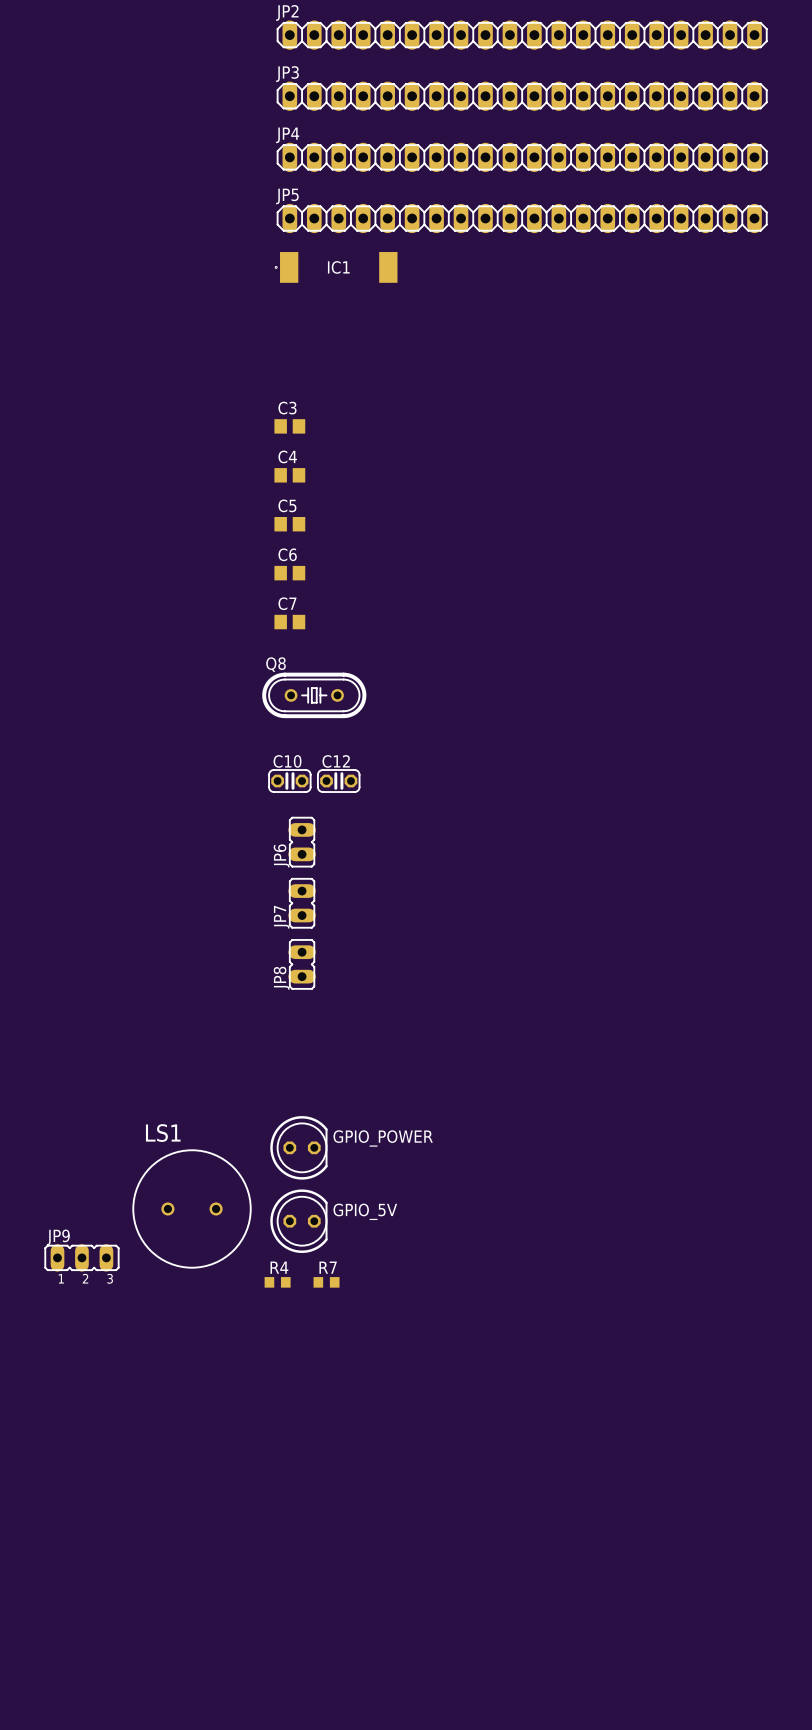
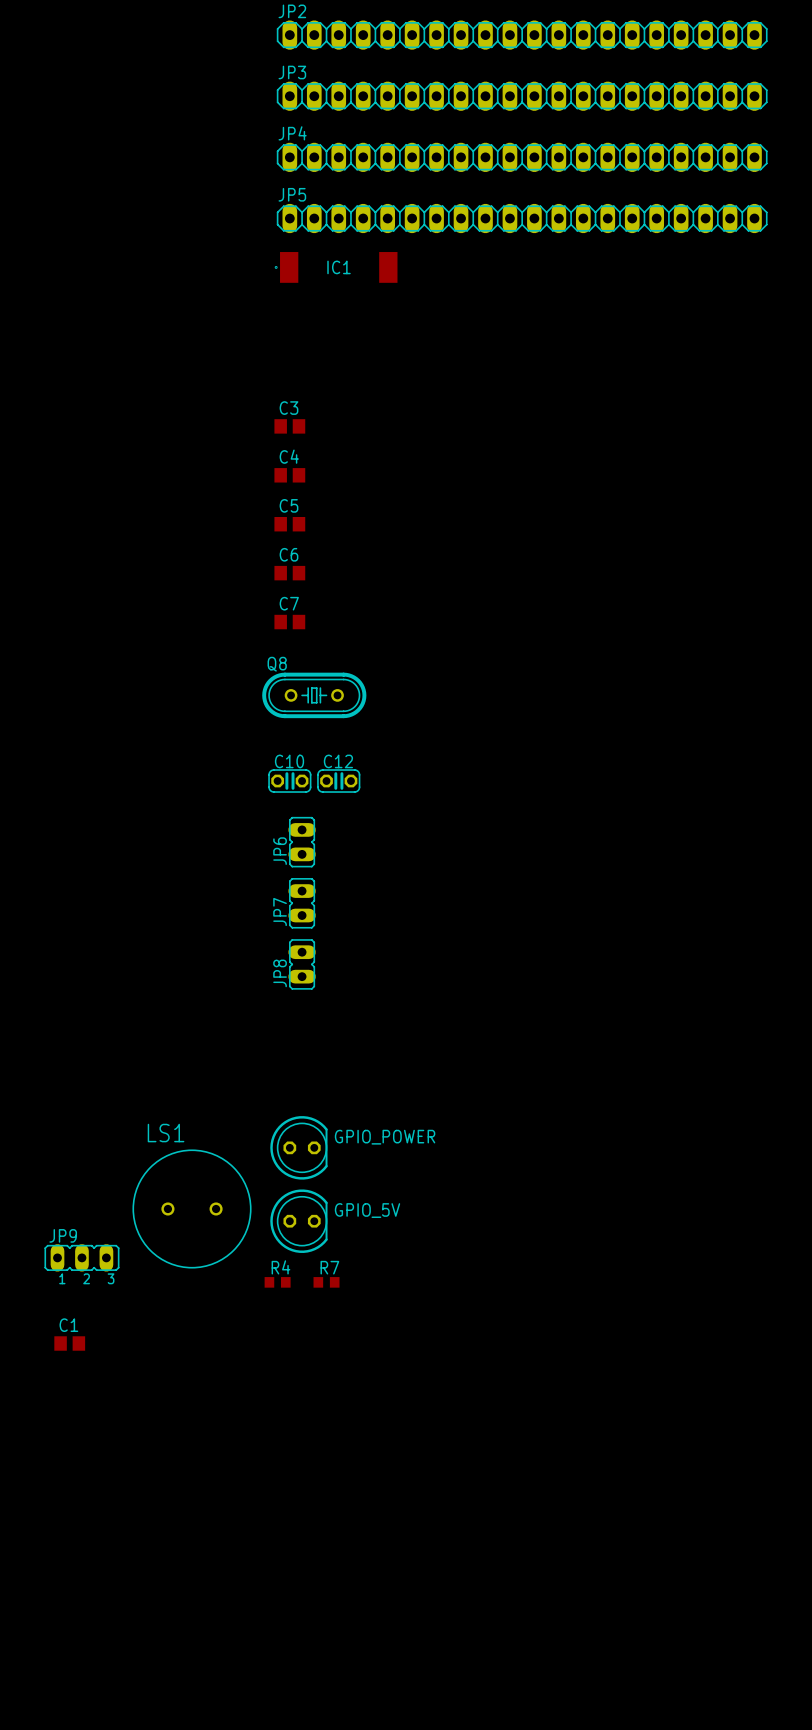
C1: none -> (69, 1343)

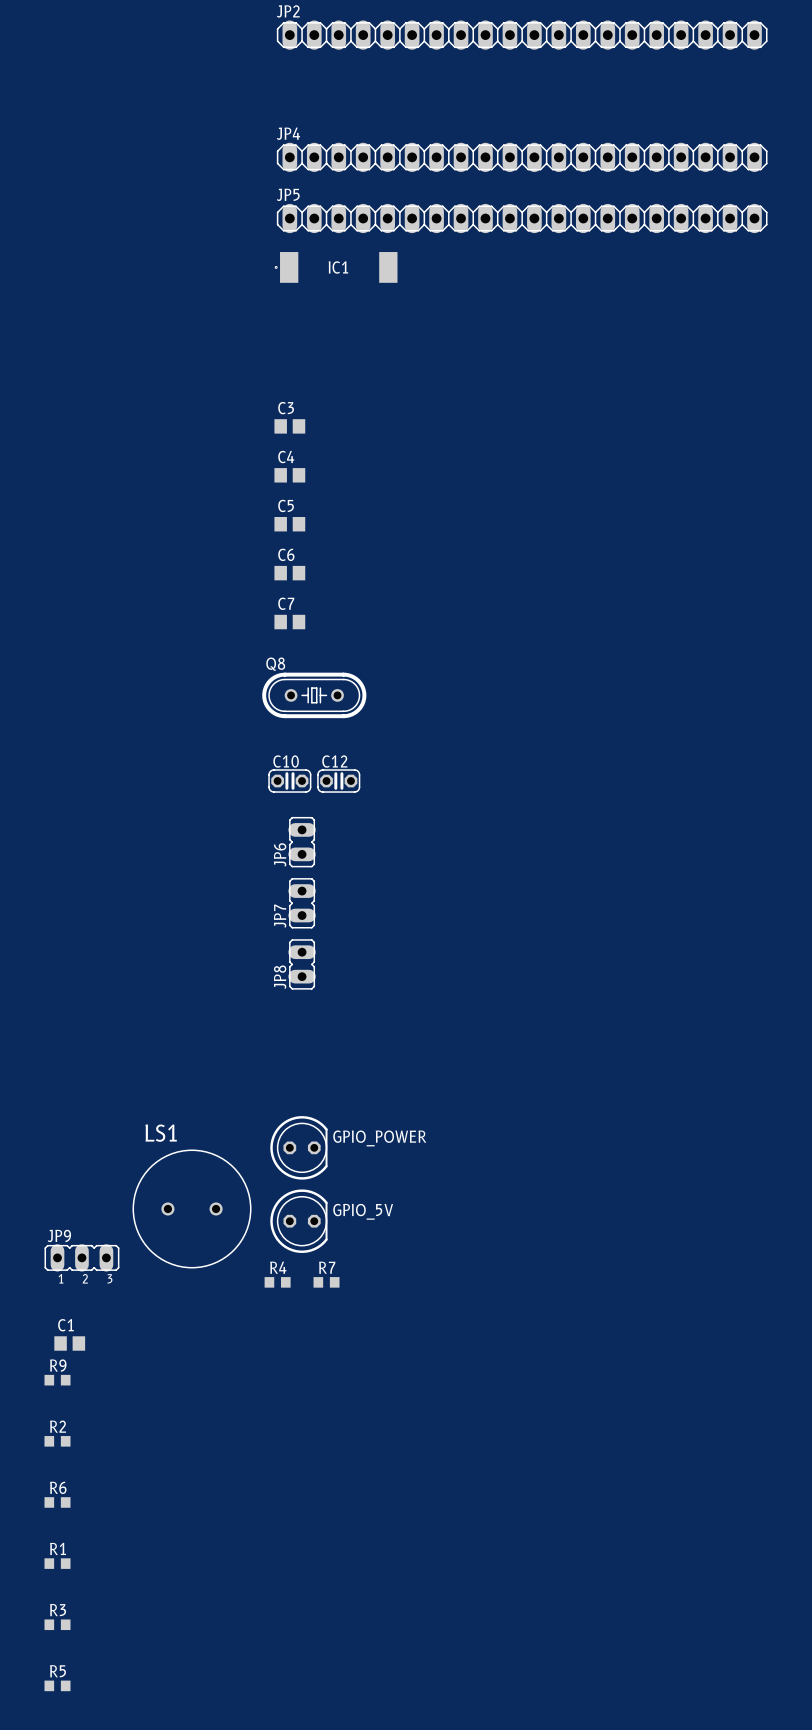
JP3: (522, 96) -> none
R9: none -> (57, 1380)
R2: none -> (57, 1441)
R6: none -> (57, 1502)
R1: none -> (57, 1563)
R3: none -> (57, 1624)
R5: none -> (57, 1685)

